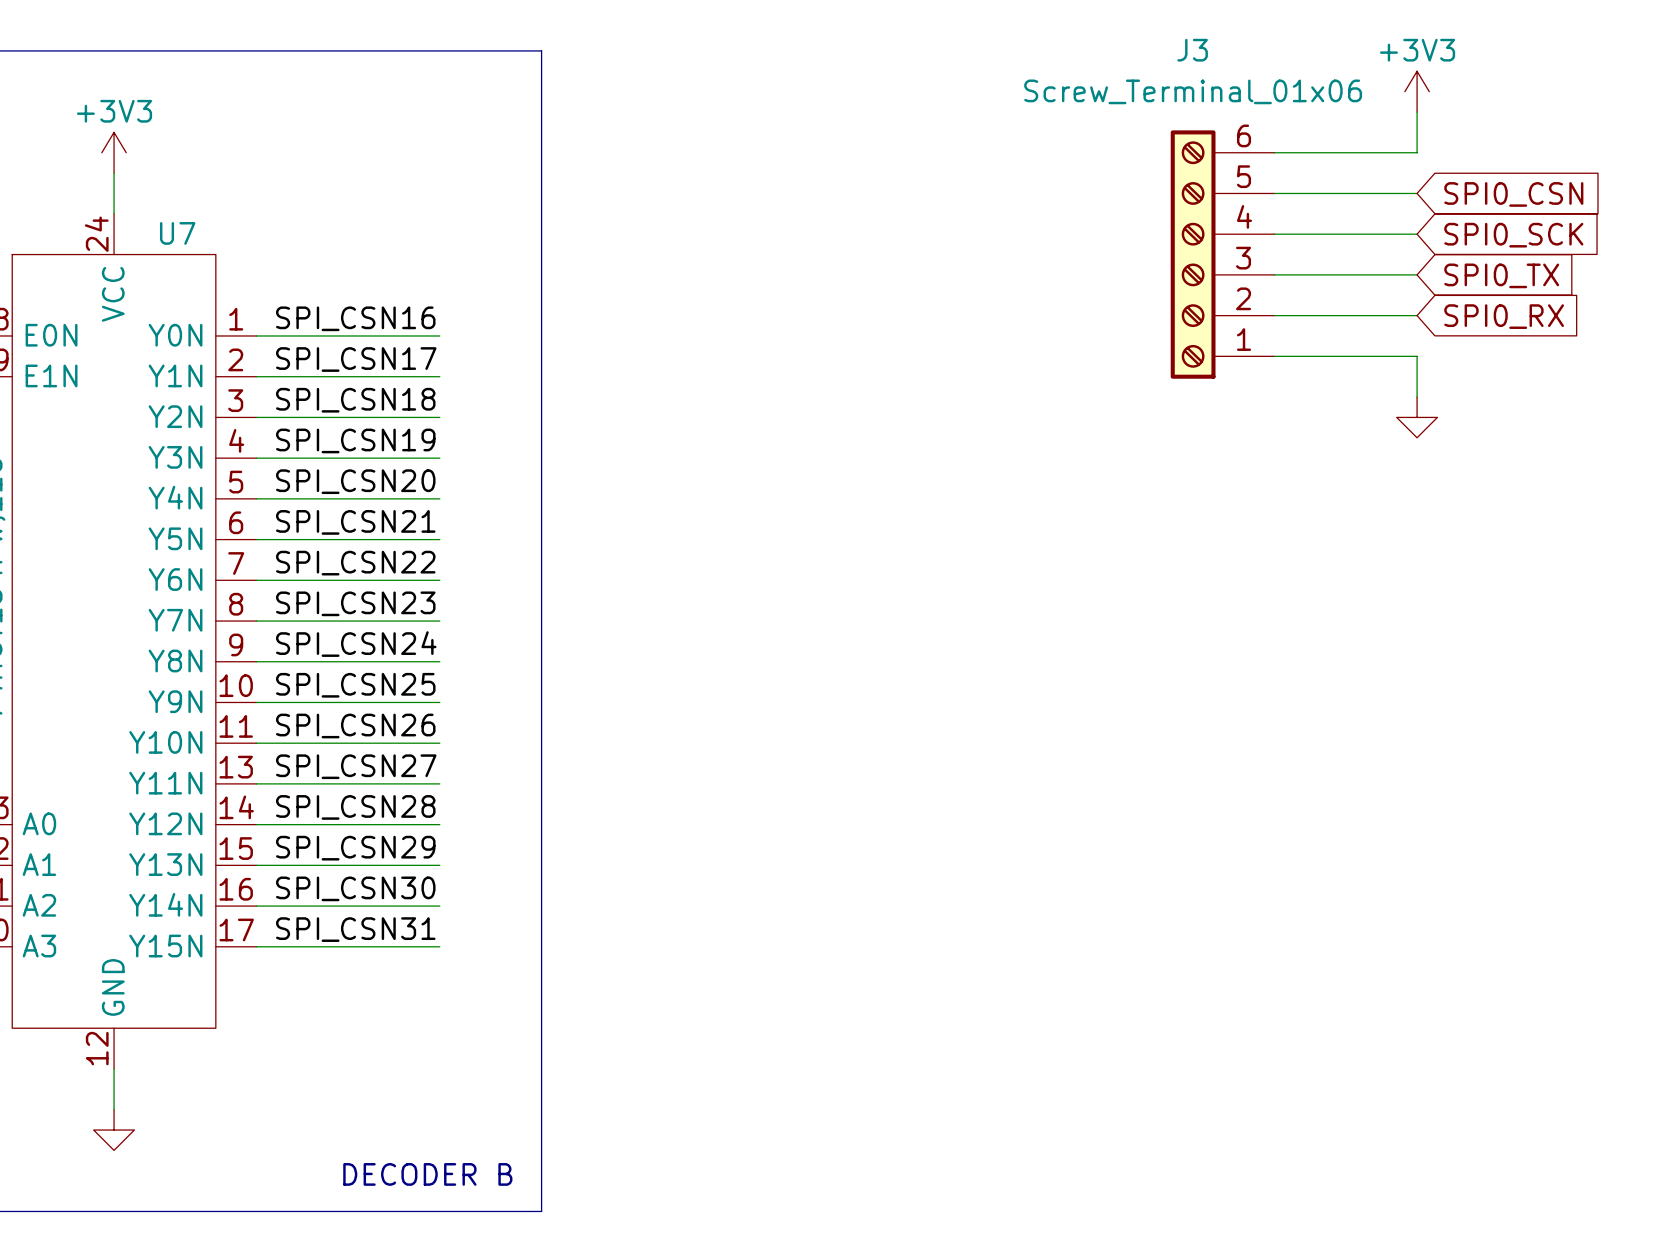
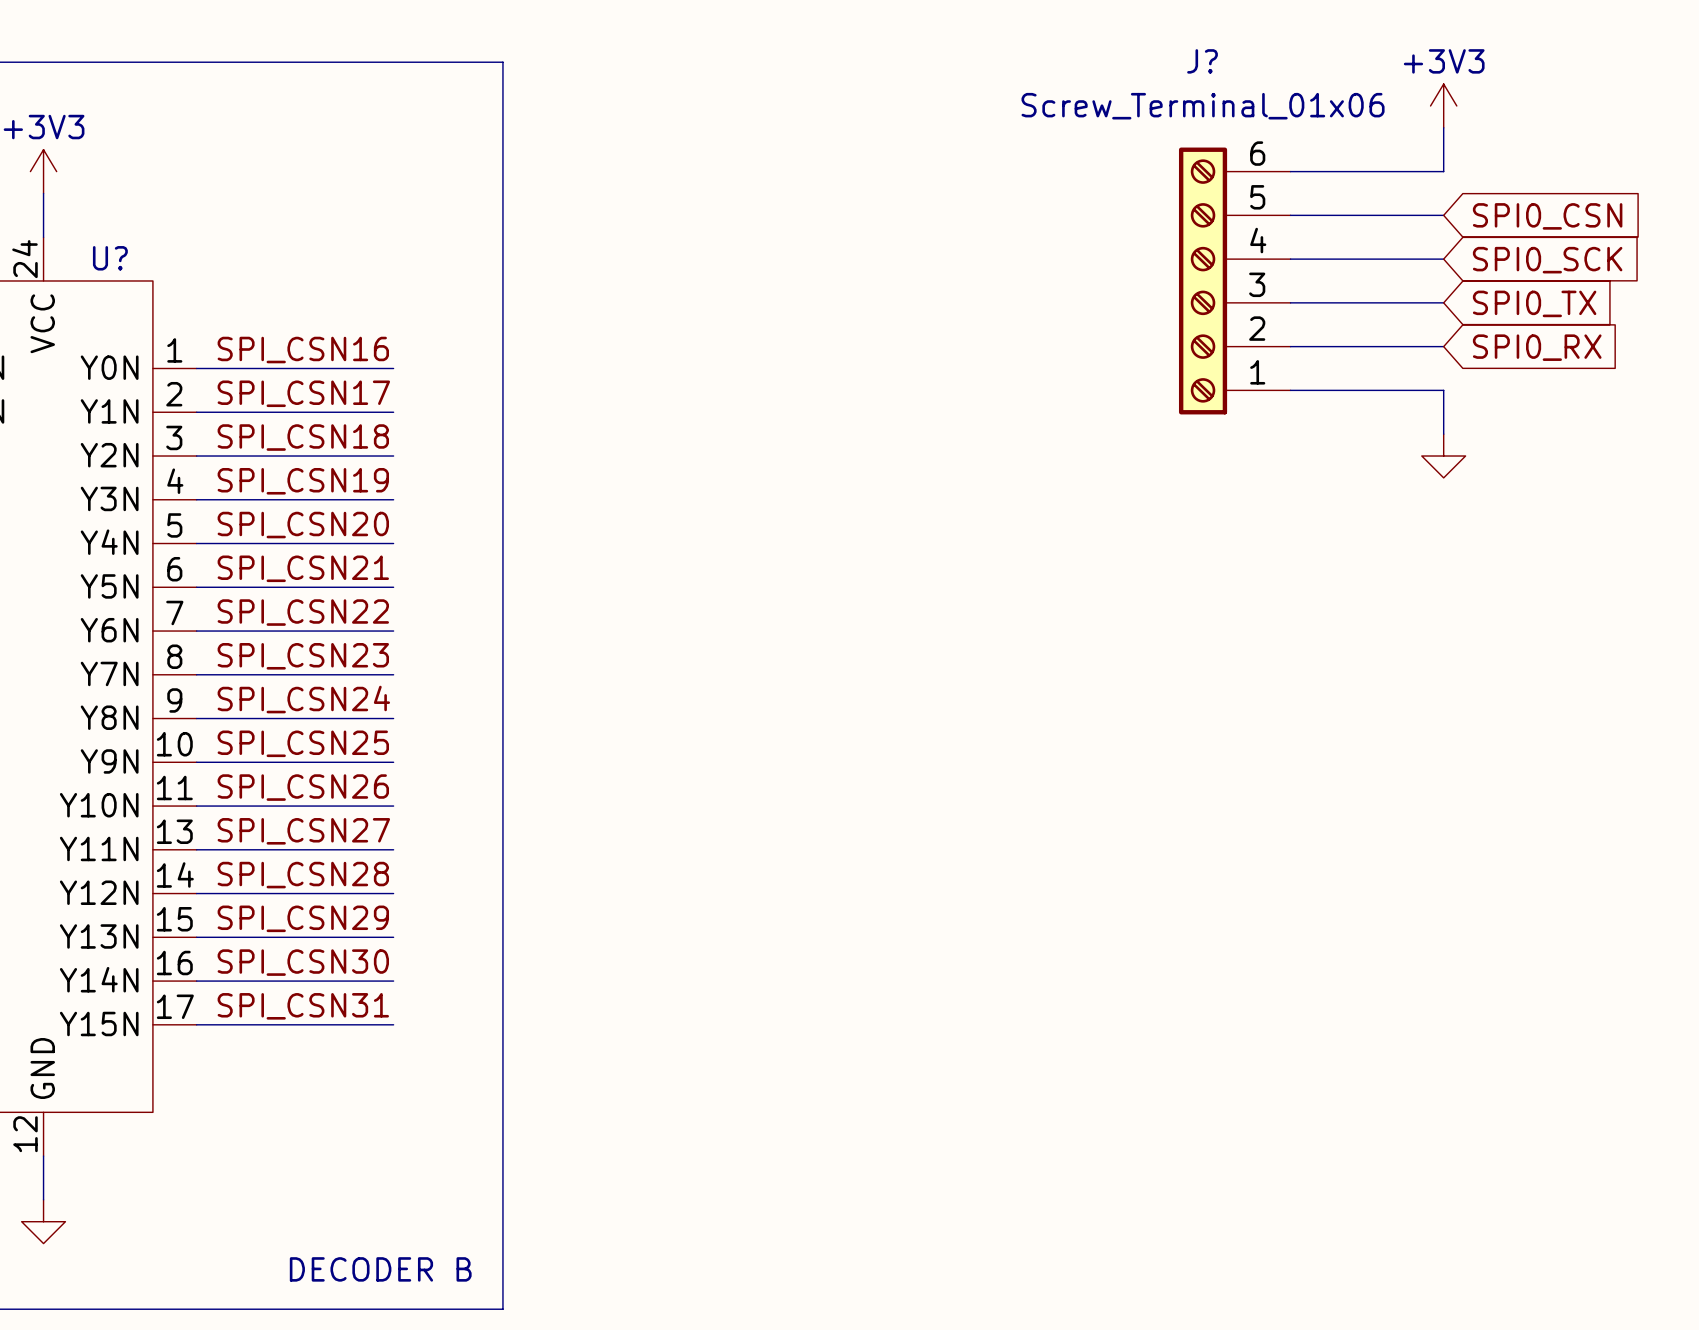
J3 name: J3 (1192, 50) -> J? (1202, 61)
U7 name: U7 (177, 233) -> U? (110, 258)

